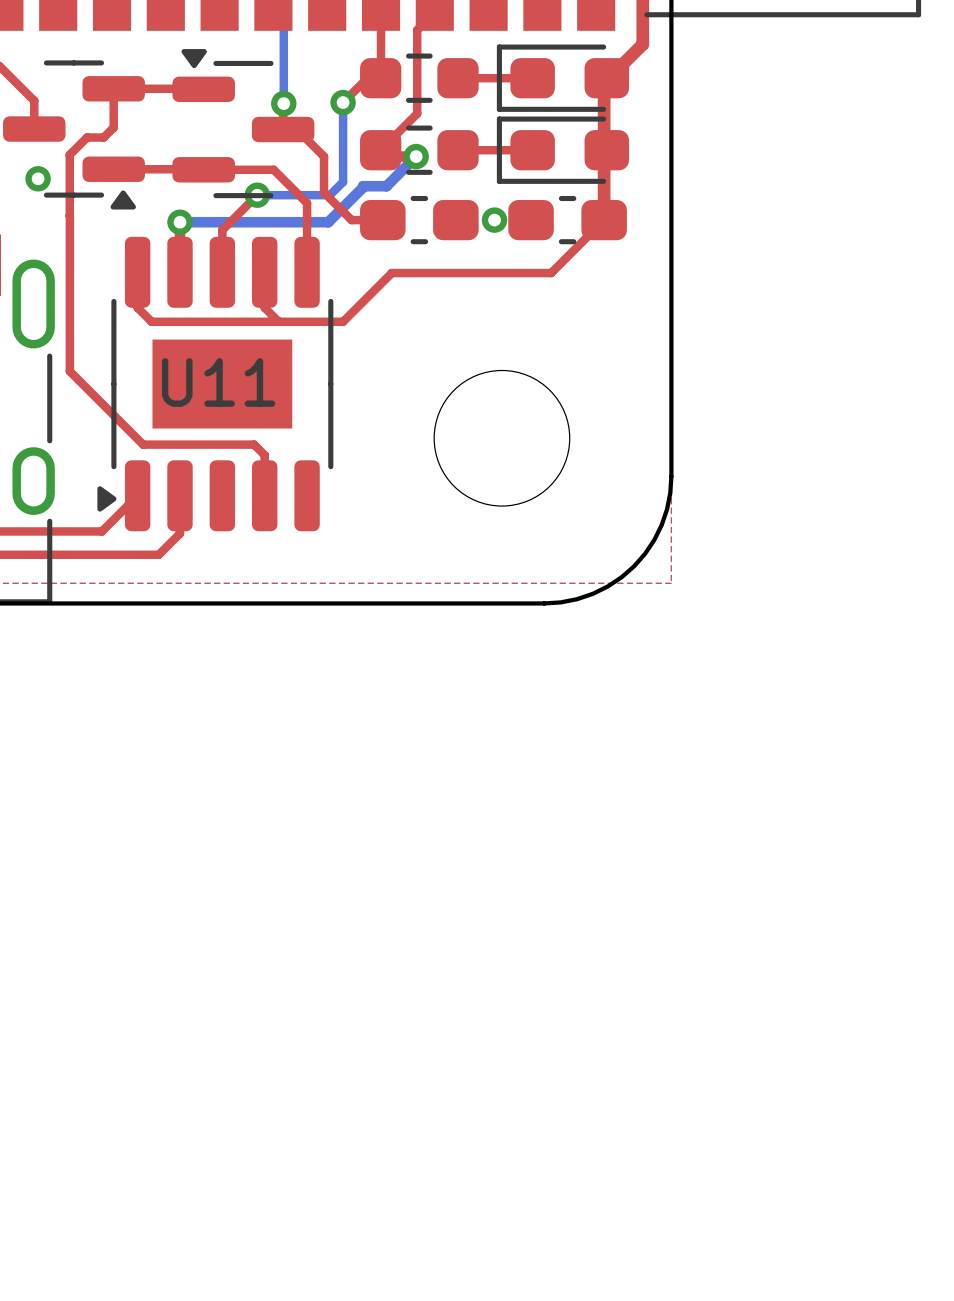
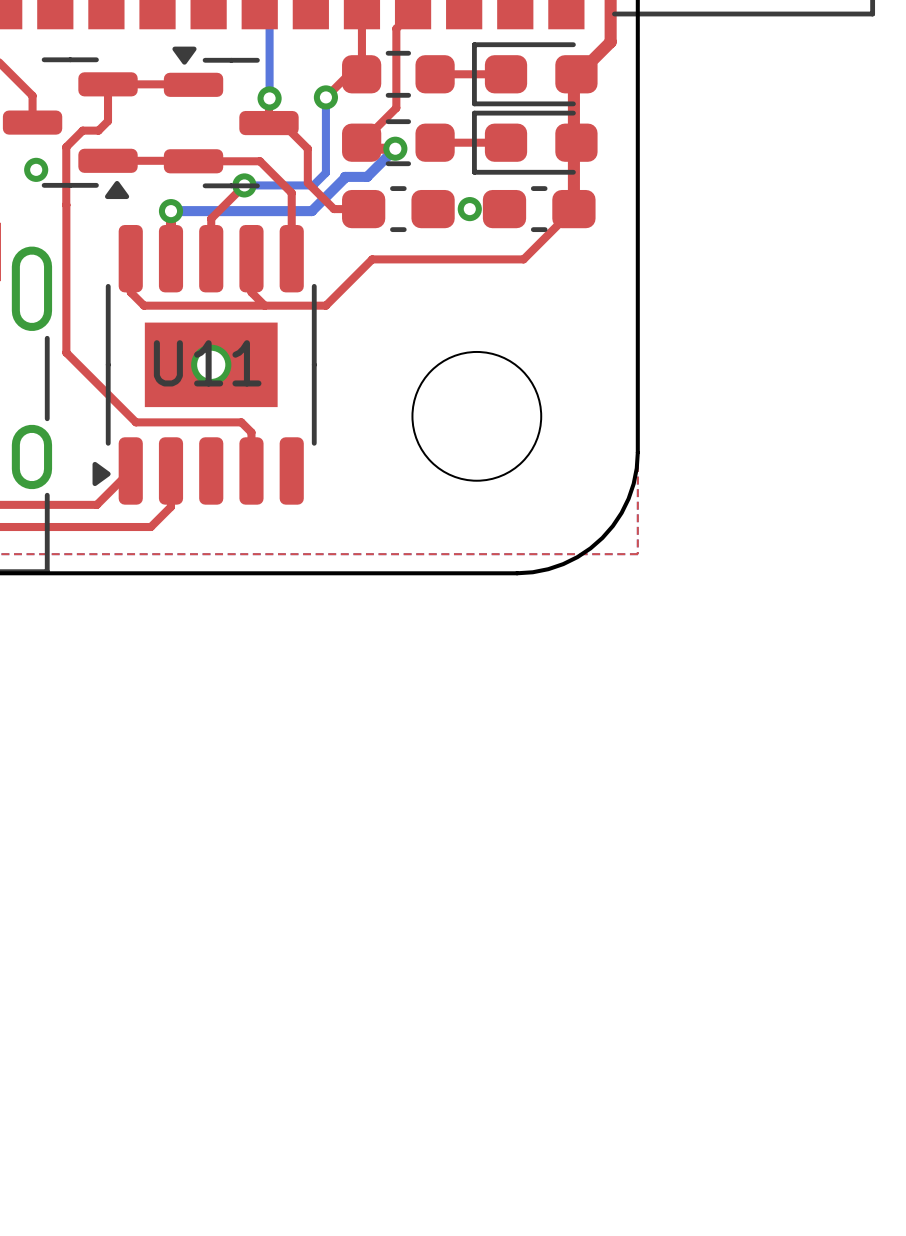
via: none -> (211, 364)

